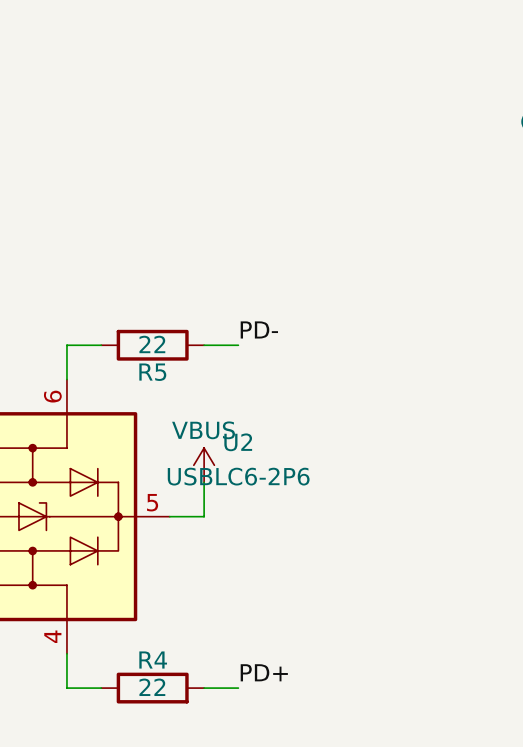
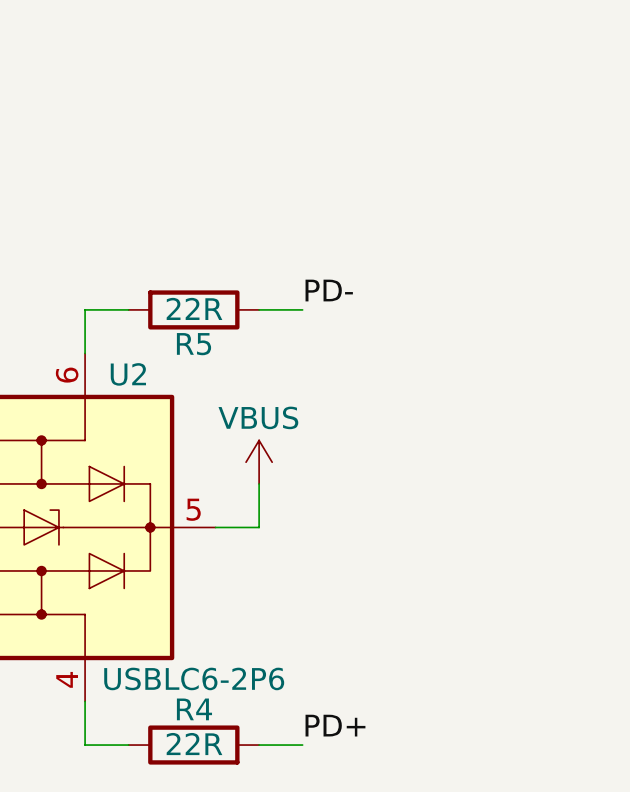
R5 value: 22 (152, 344) -> 22R (194, 308)
U2 name position: U2 (238, 442) -> U2 (128, 374)
U2 value position: USBLC6-2P6 (238, 476) -> USBLC6-2P6 (194, 678)
R4 value: 22 (152, 687) -> 22R (194, 744)

